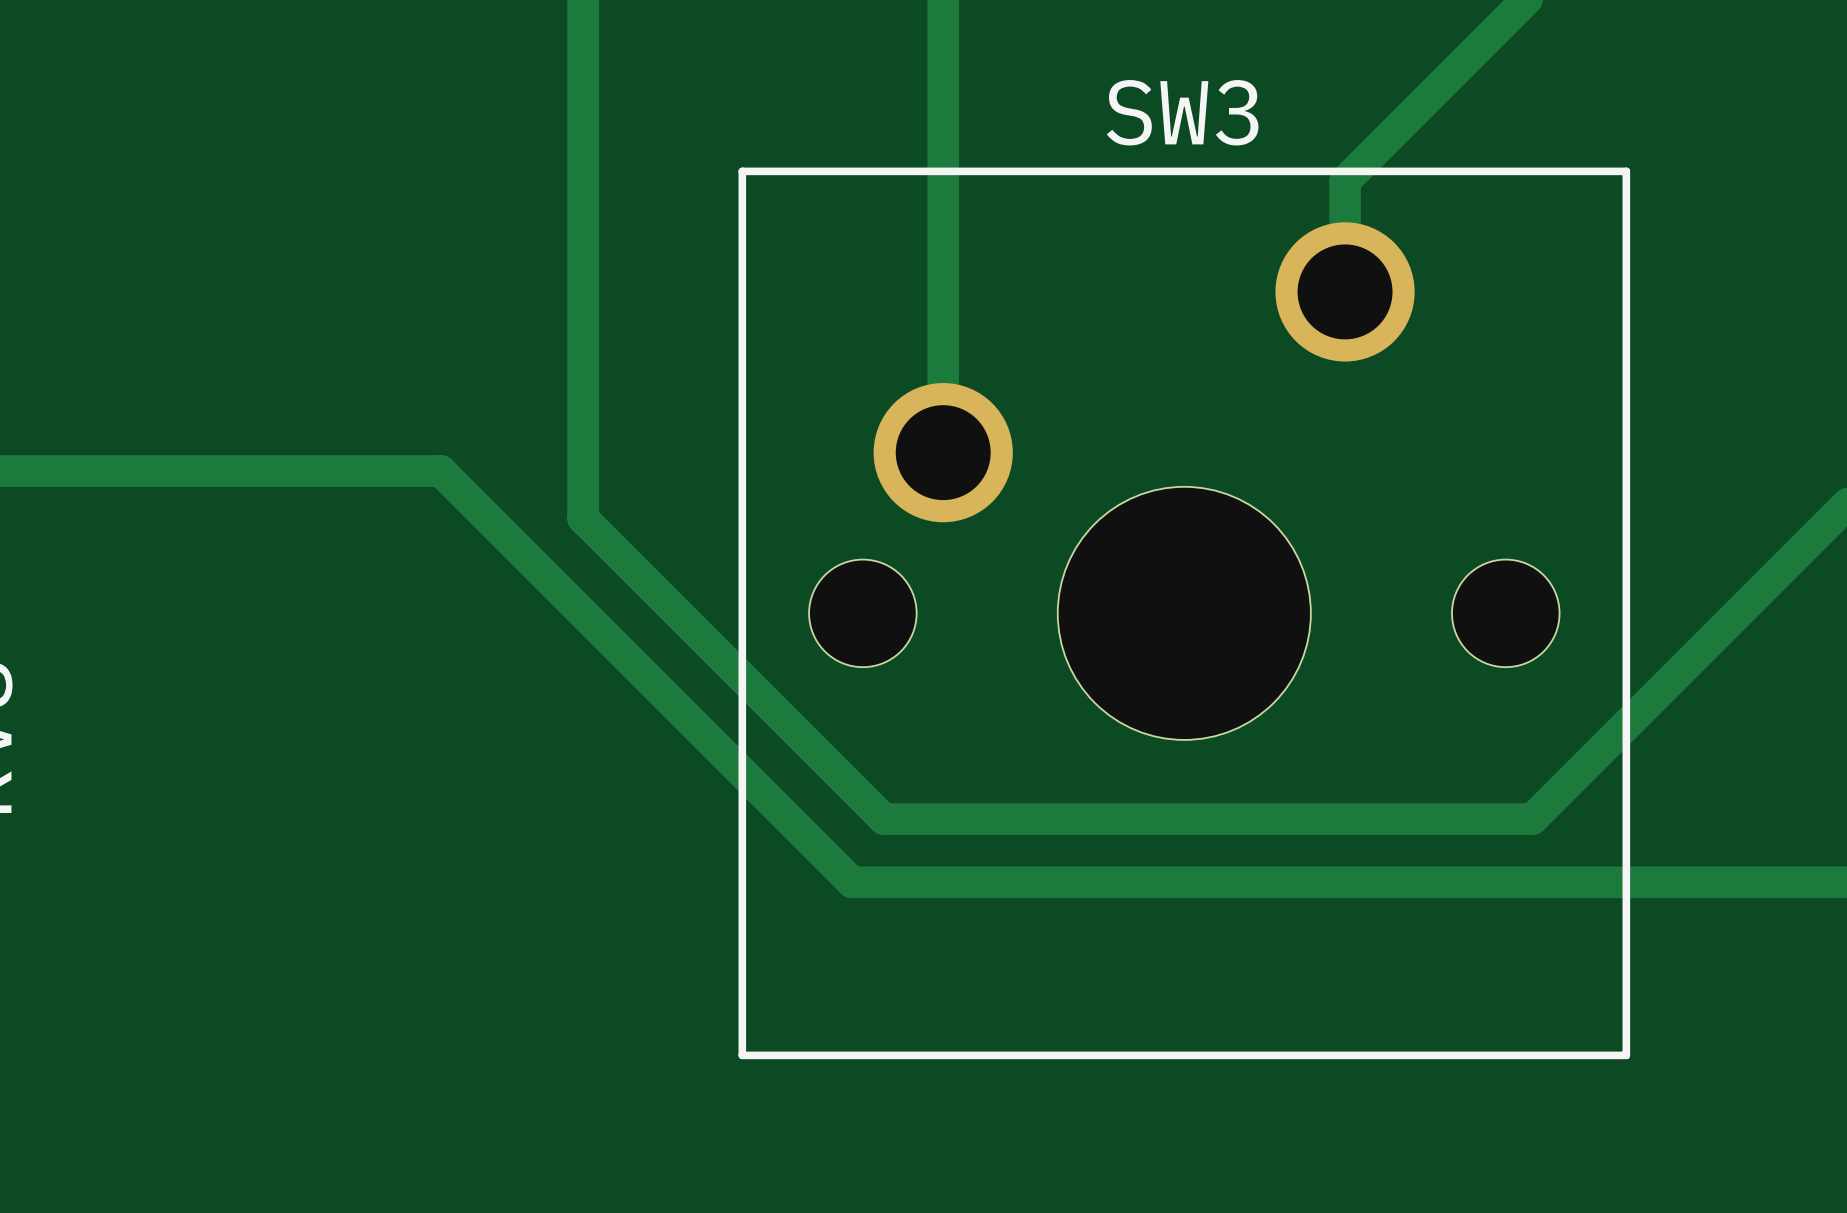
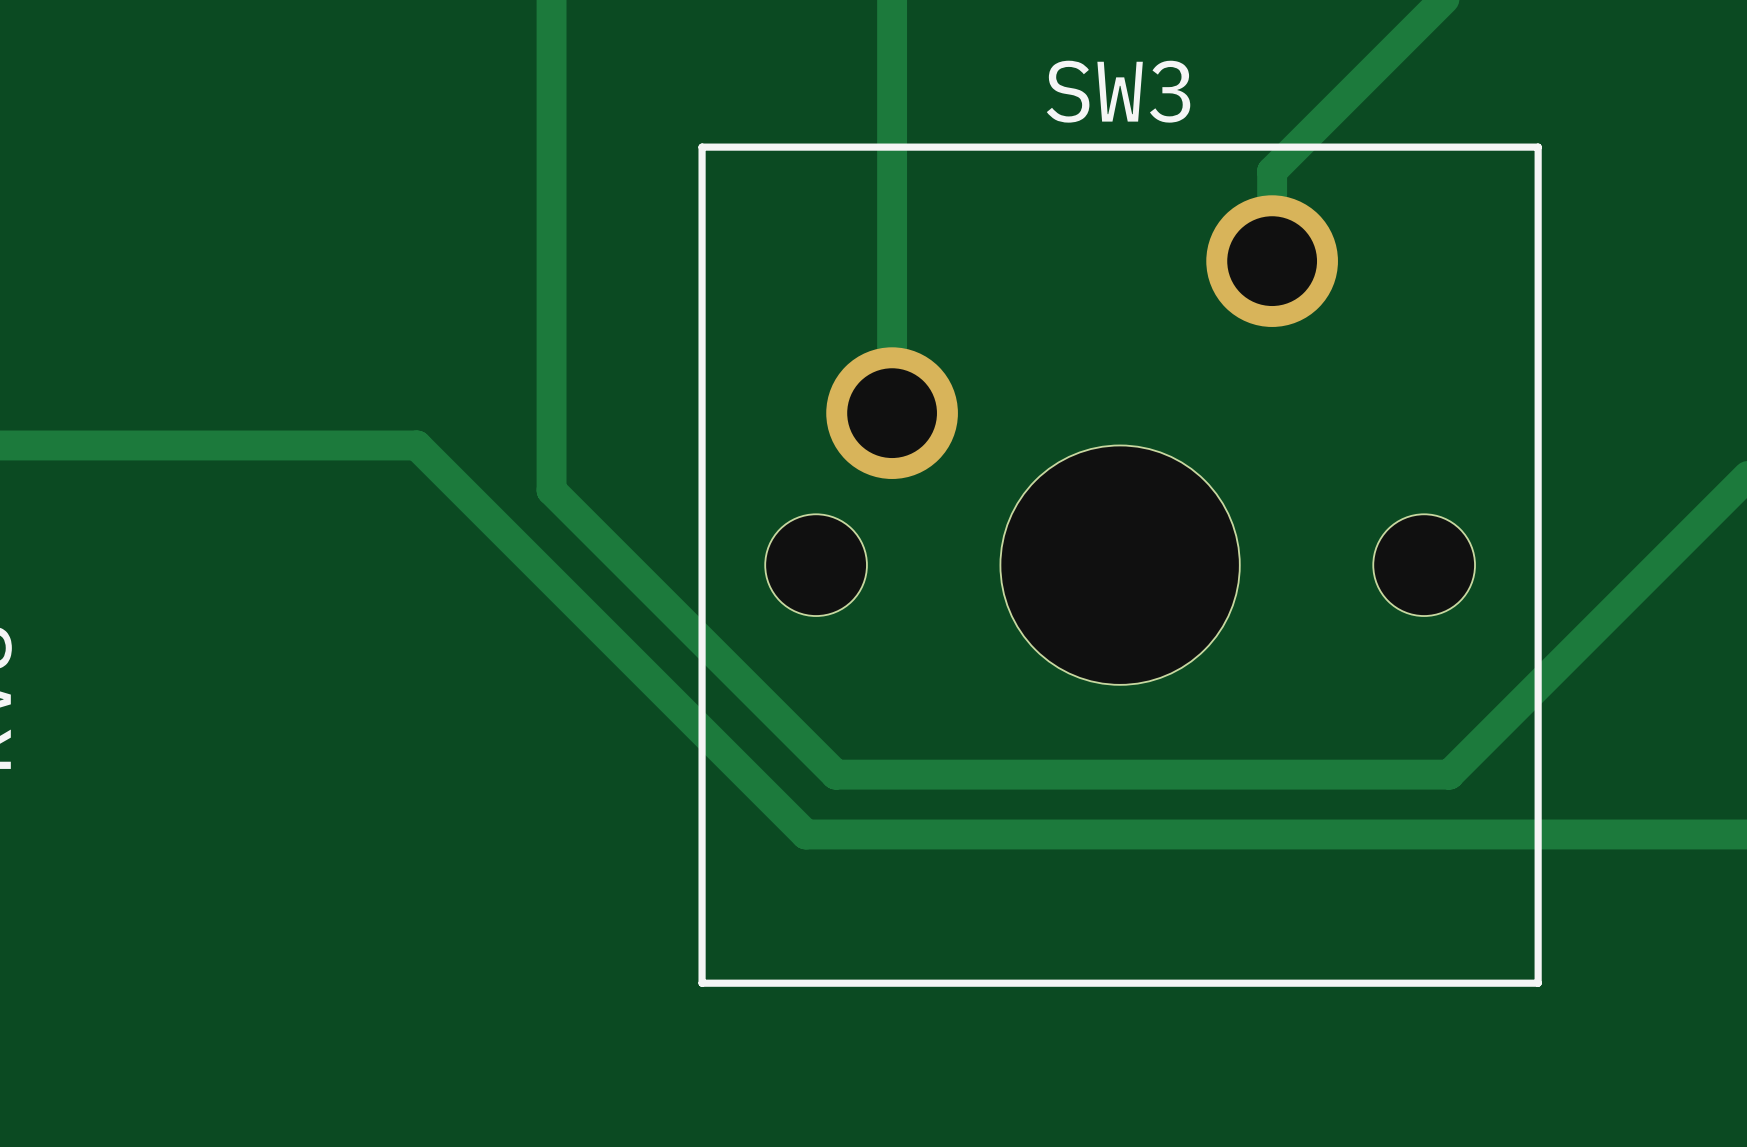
SW3 position: (1184, 613) -> (1120, 565)

